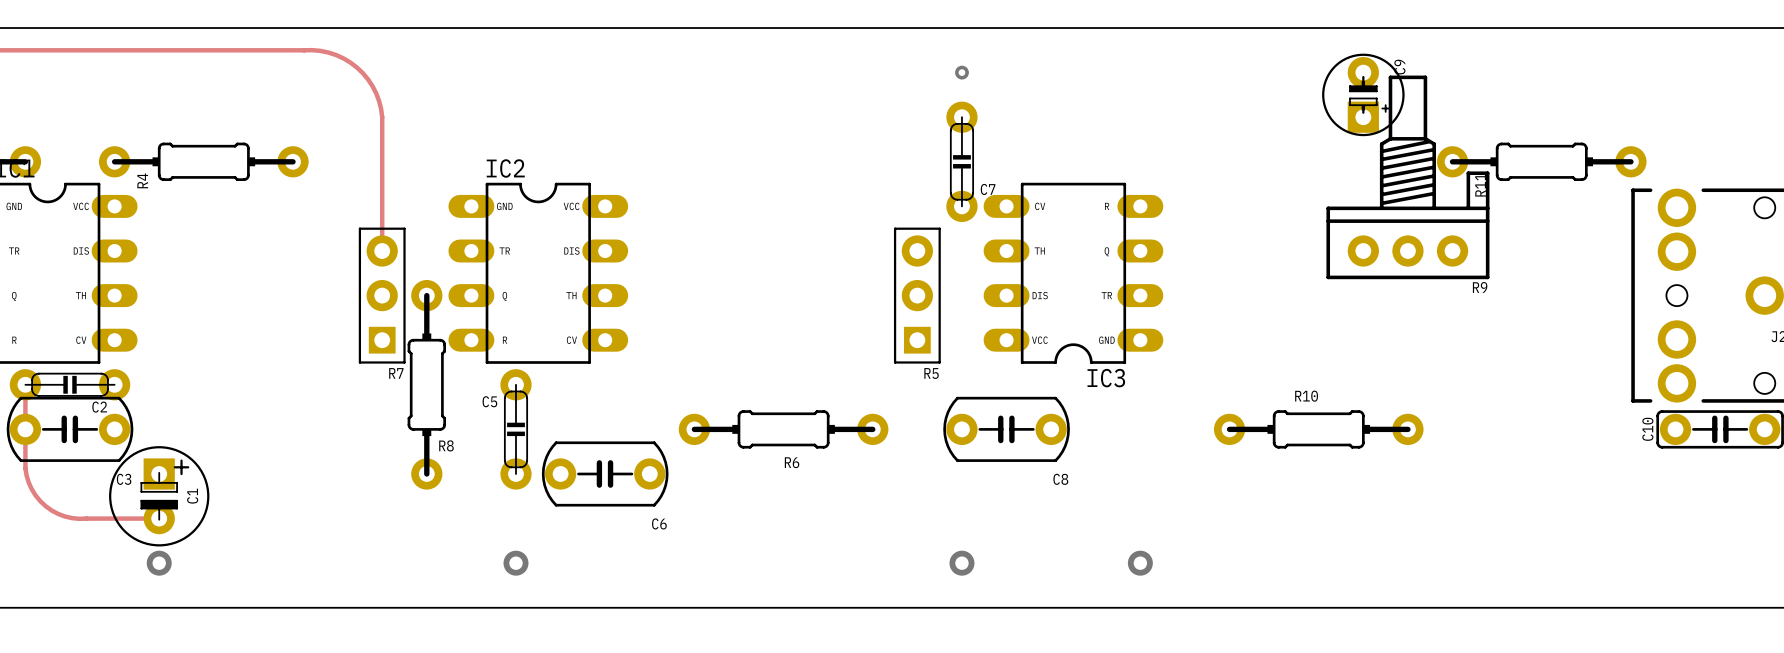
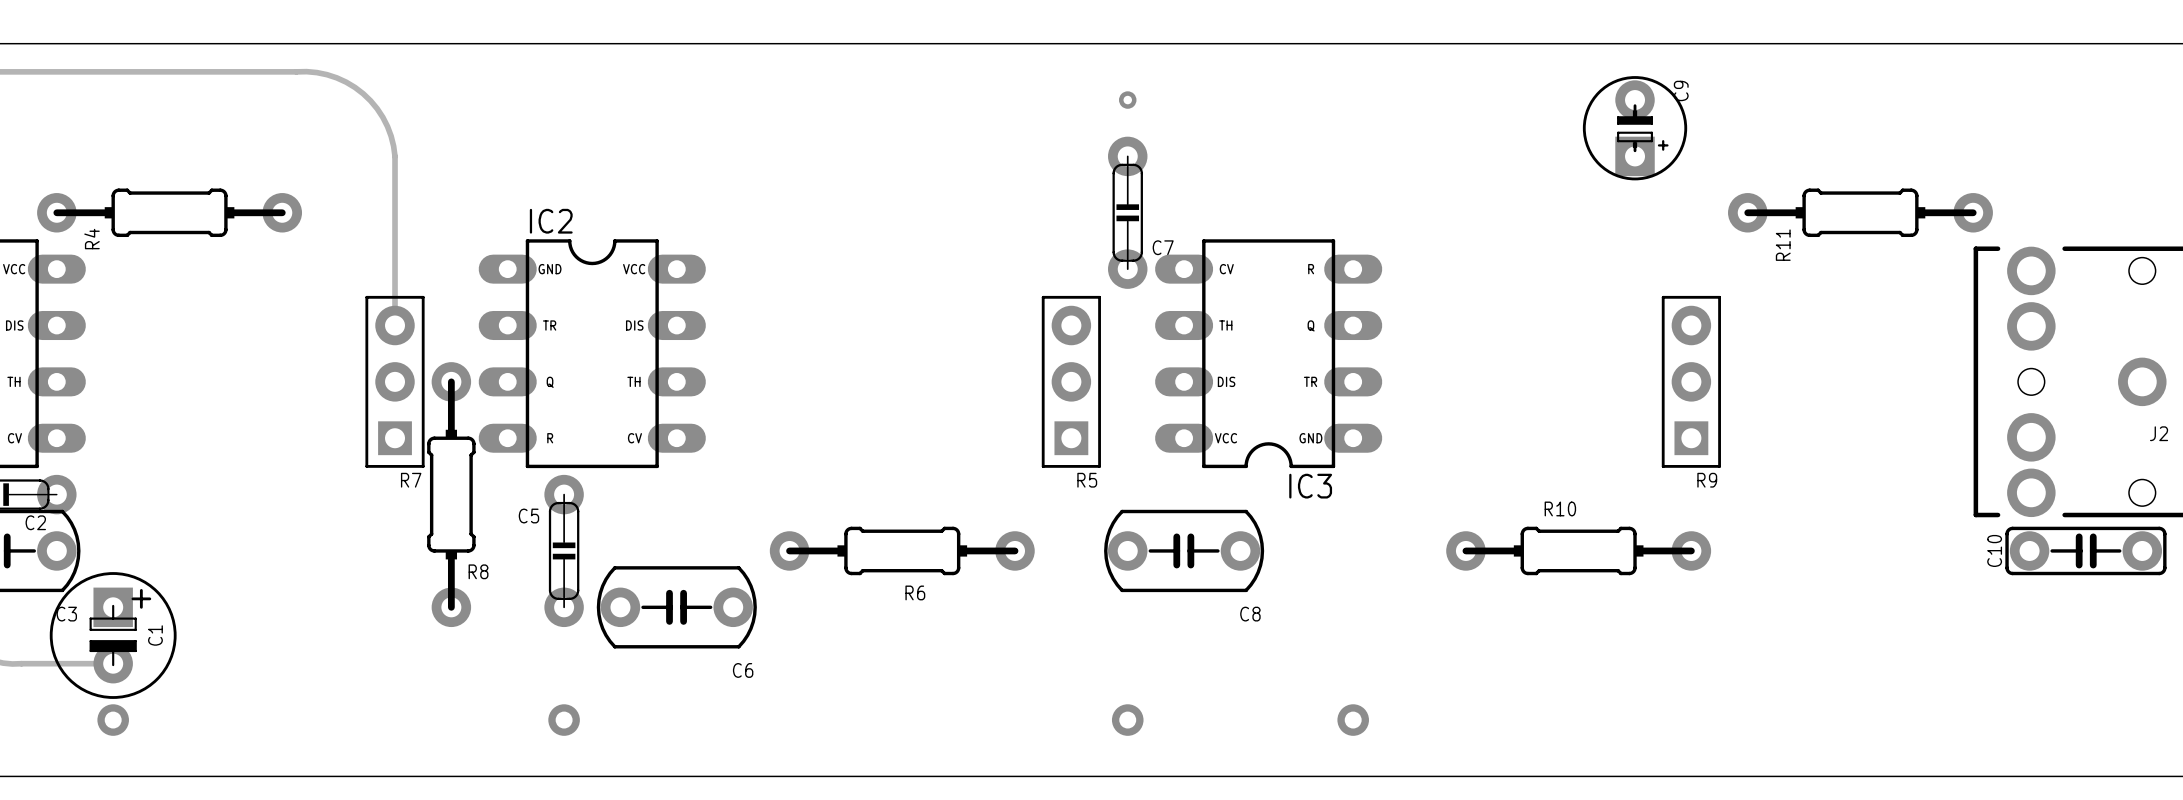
R9 footprint: [1326, 75, 1490, 280] -> [1661, 295, 1721, 468]
R9 name position: R9 (1480, 287) -> R9 (1707, 480)

